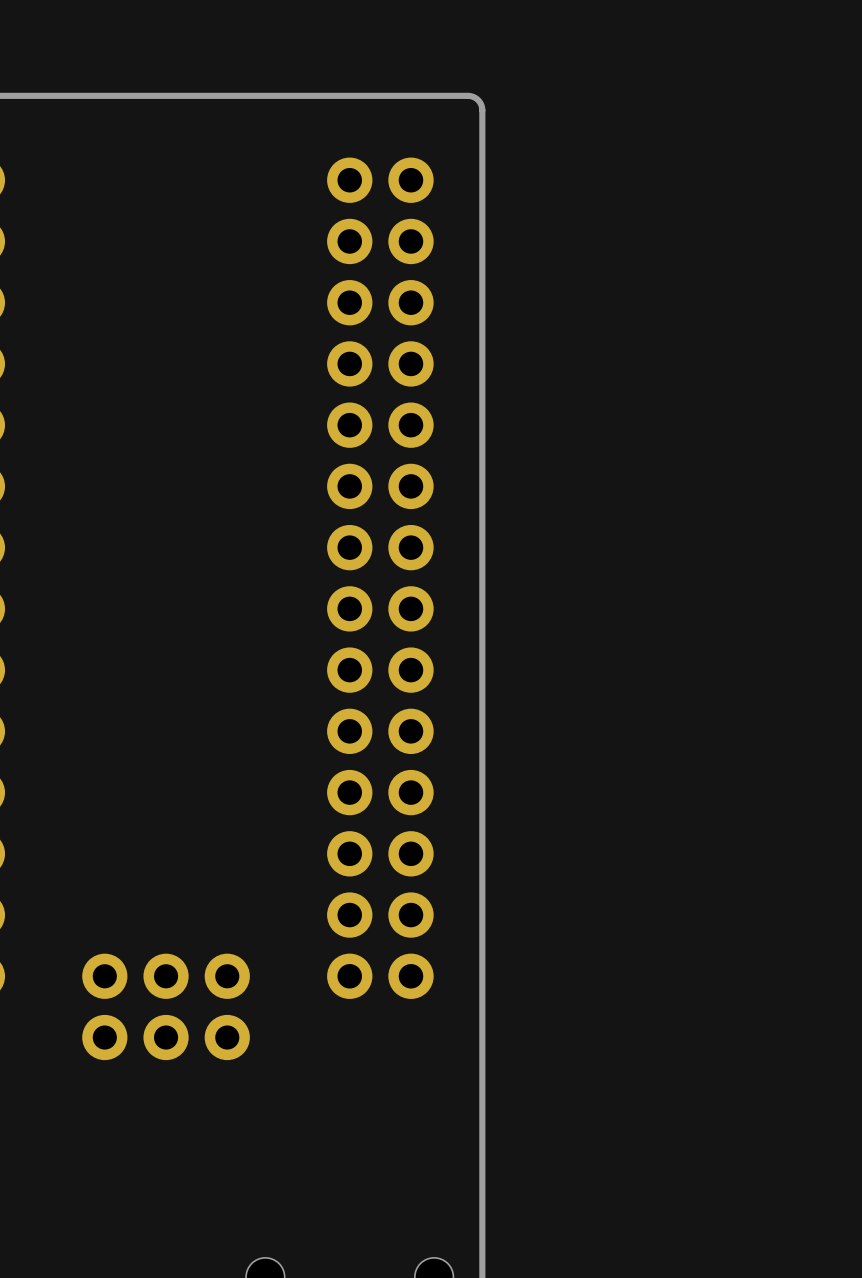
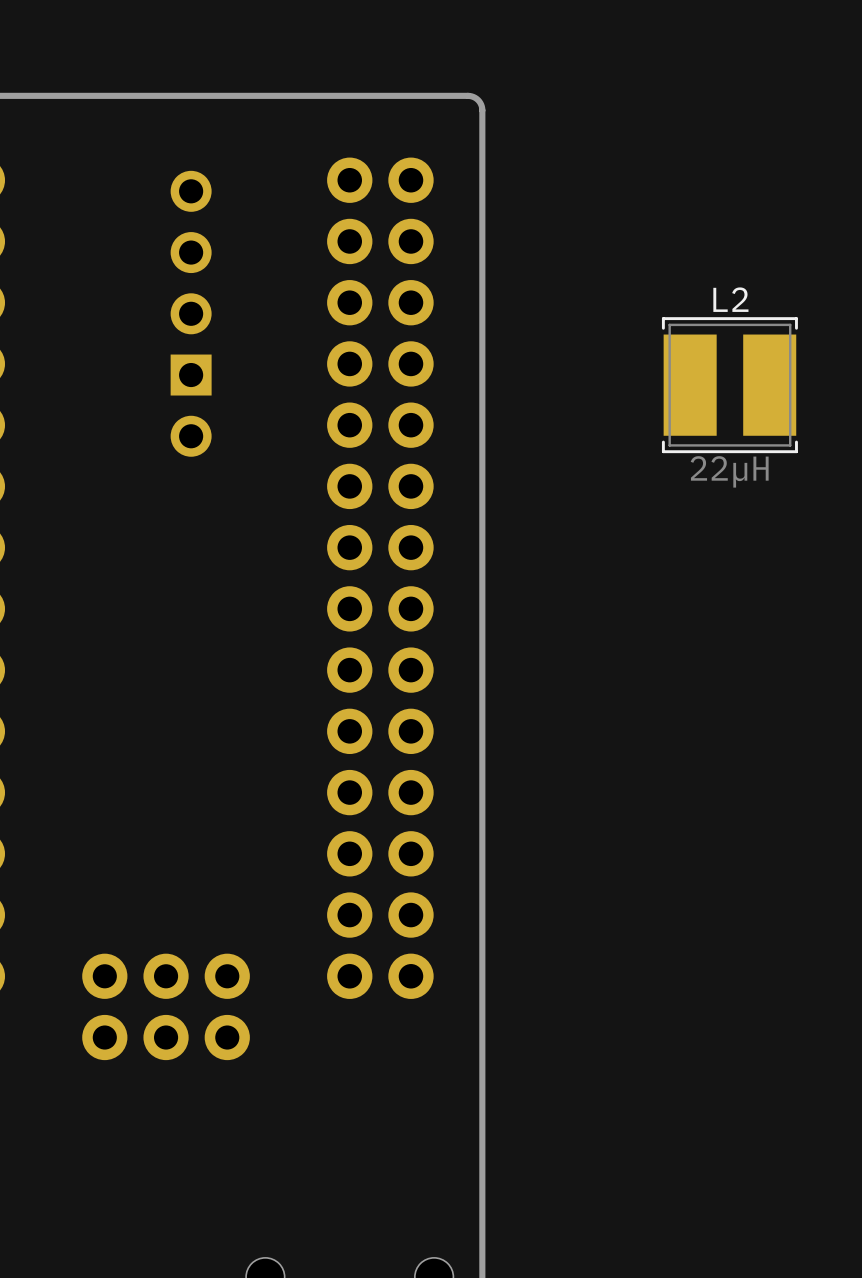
part: none -> (191, 313)
L2: none -> 22µH (729, 385)

